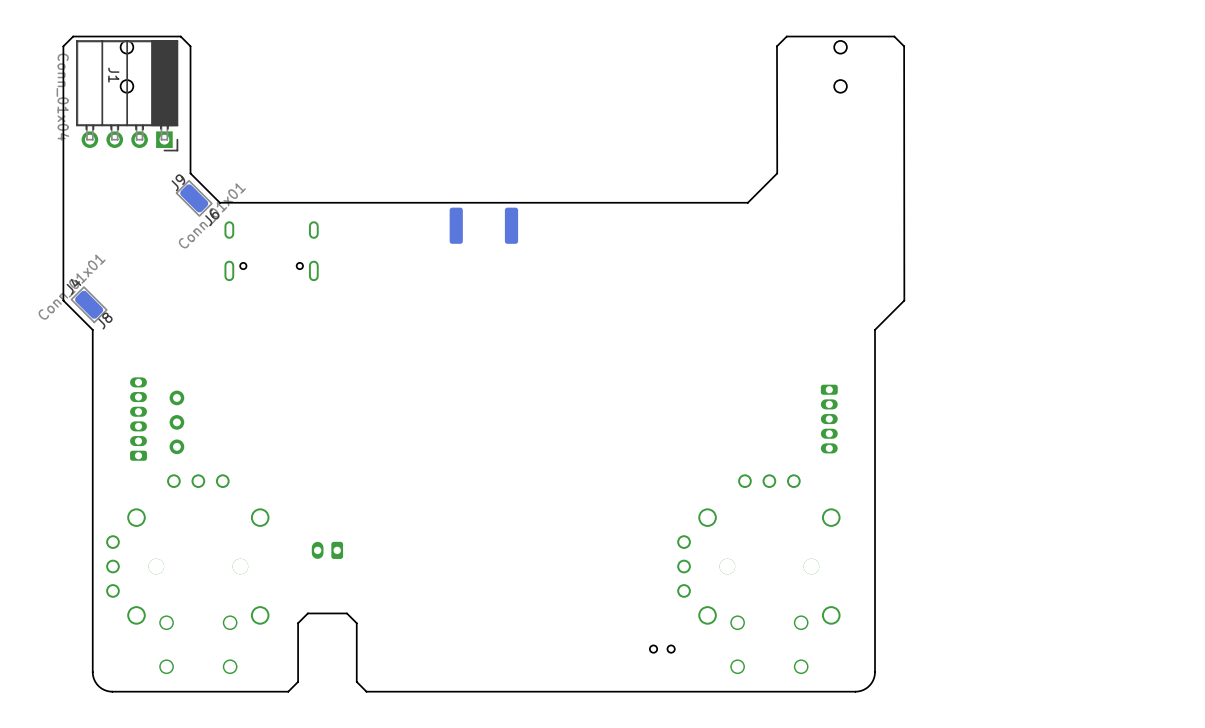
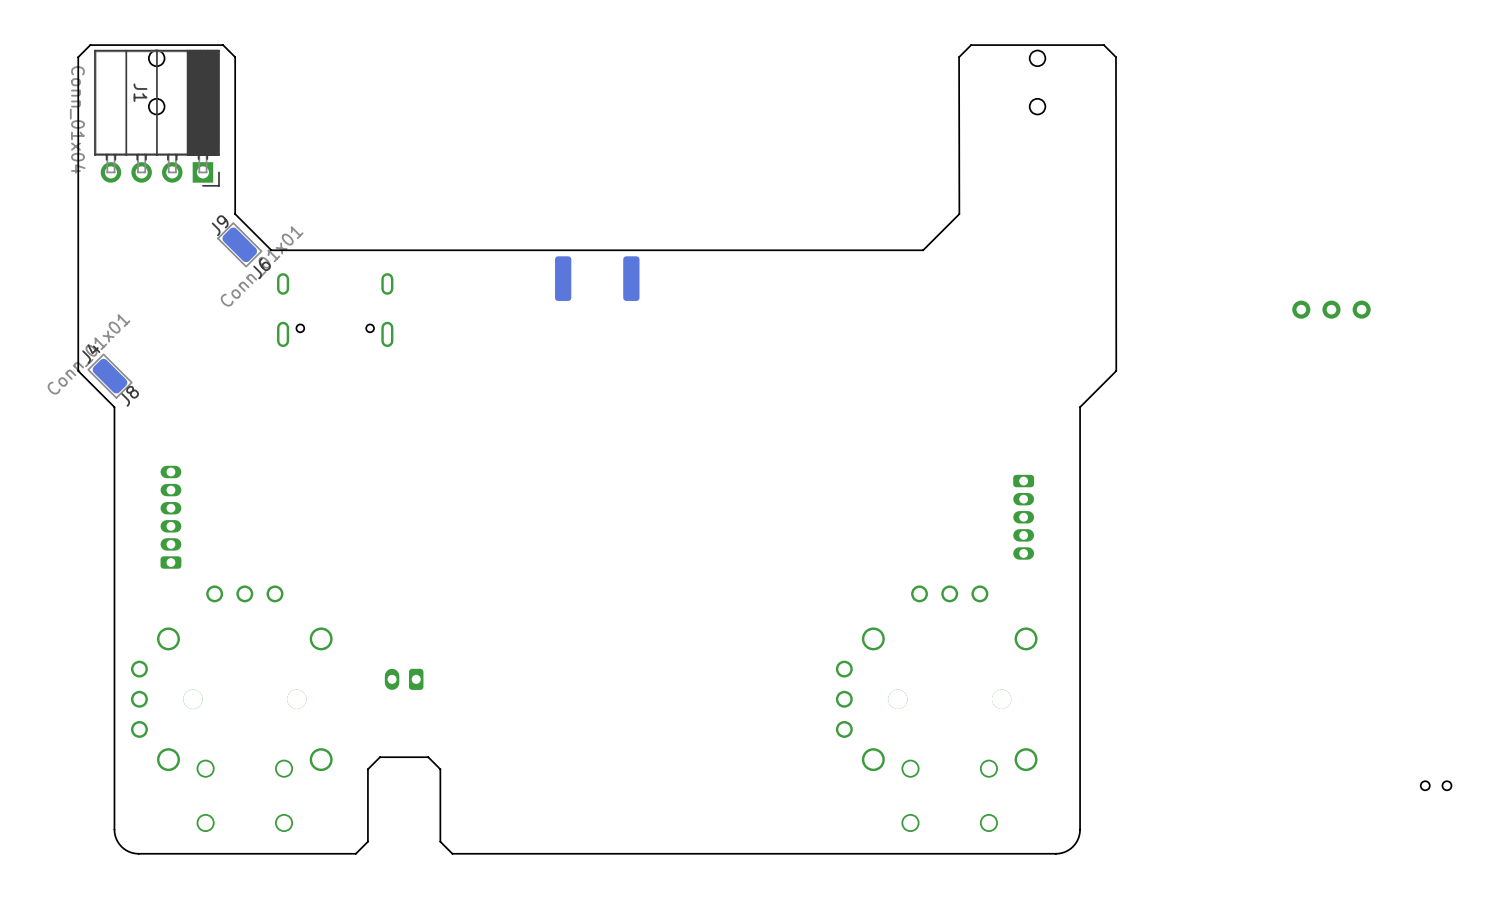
part: none -> (1331, 309)
part: (176, 422) -> none
part: none -> (1436, 785)
part: (662, 649) -> none

